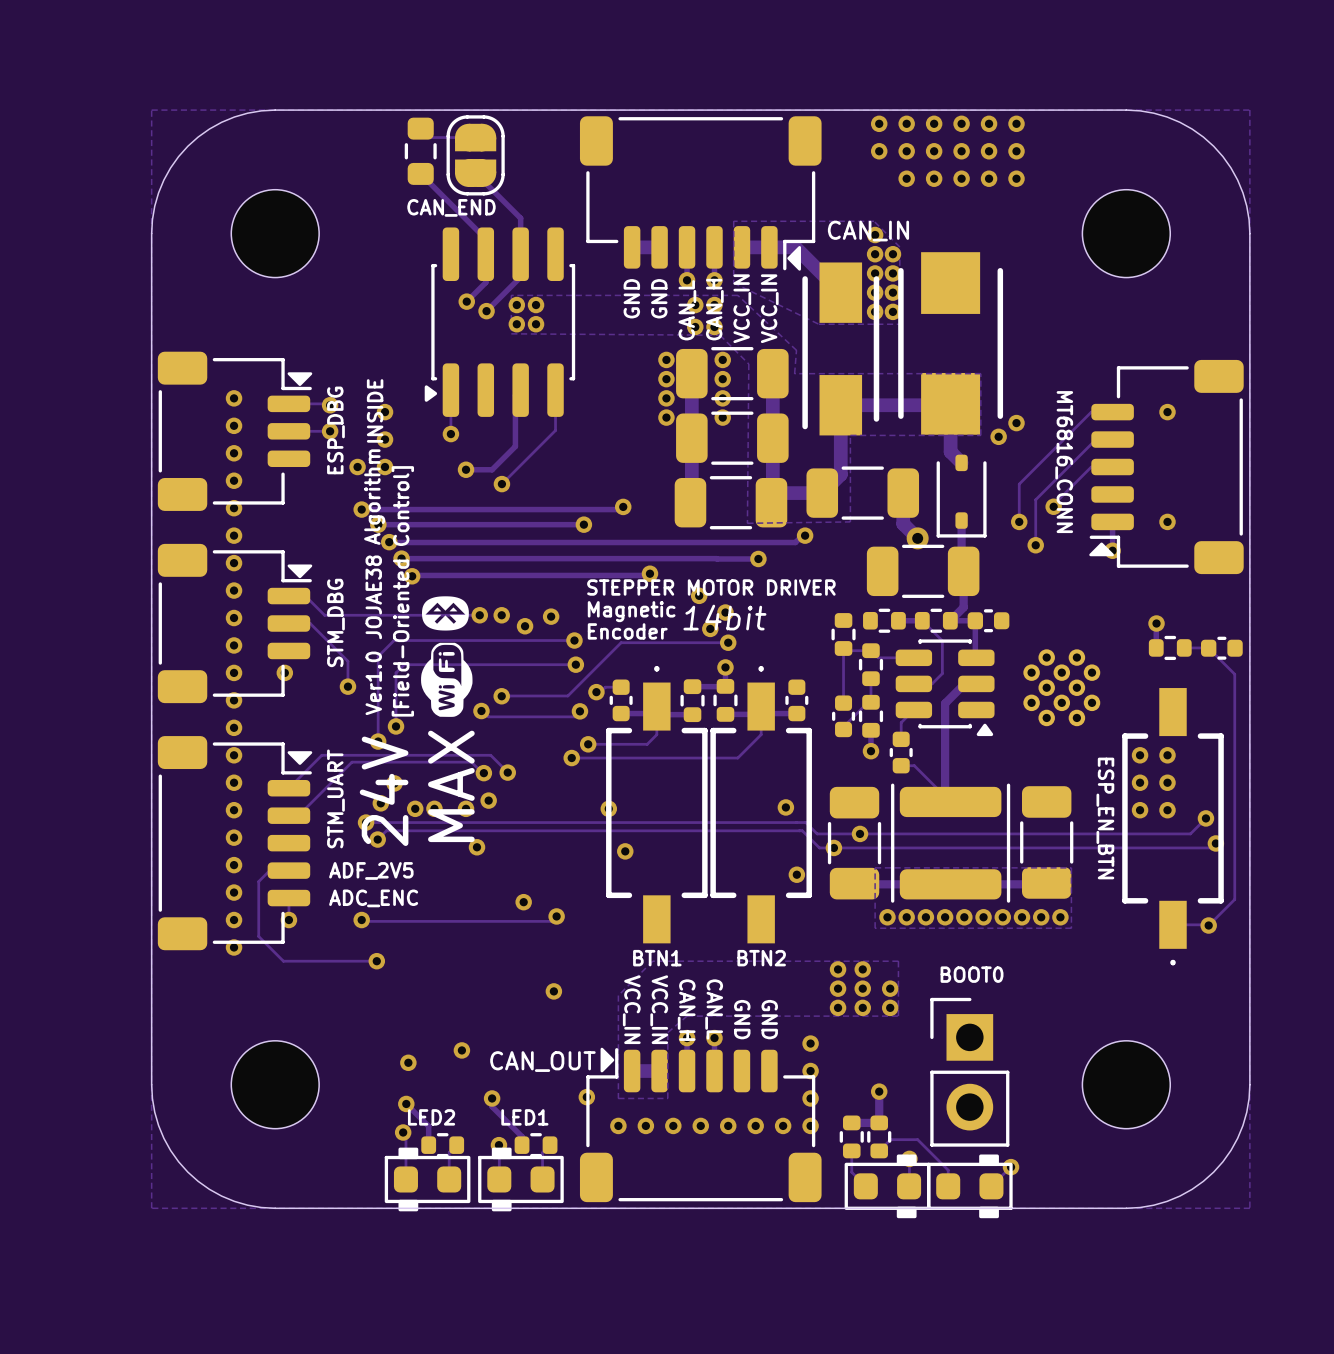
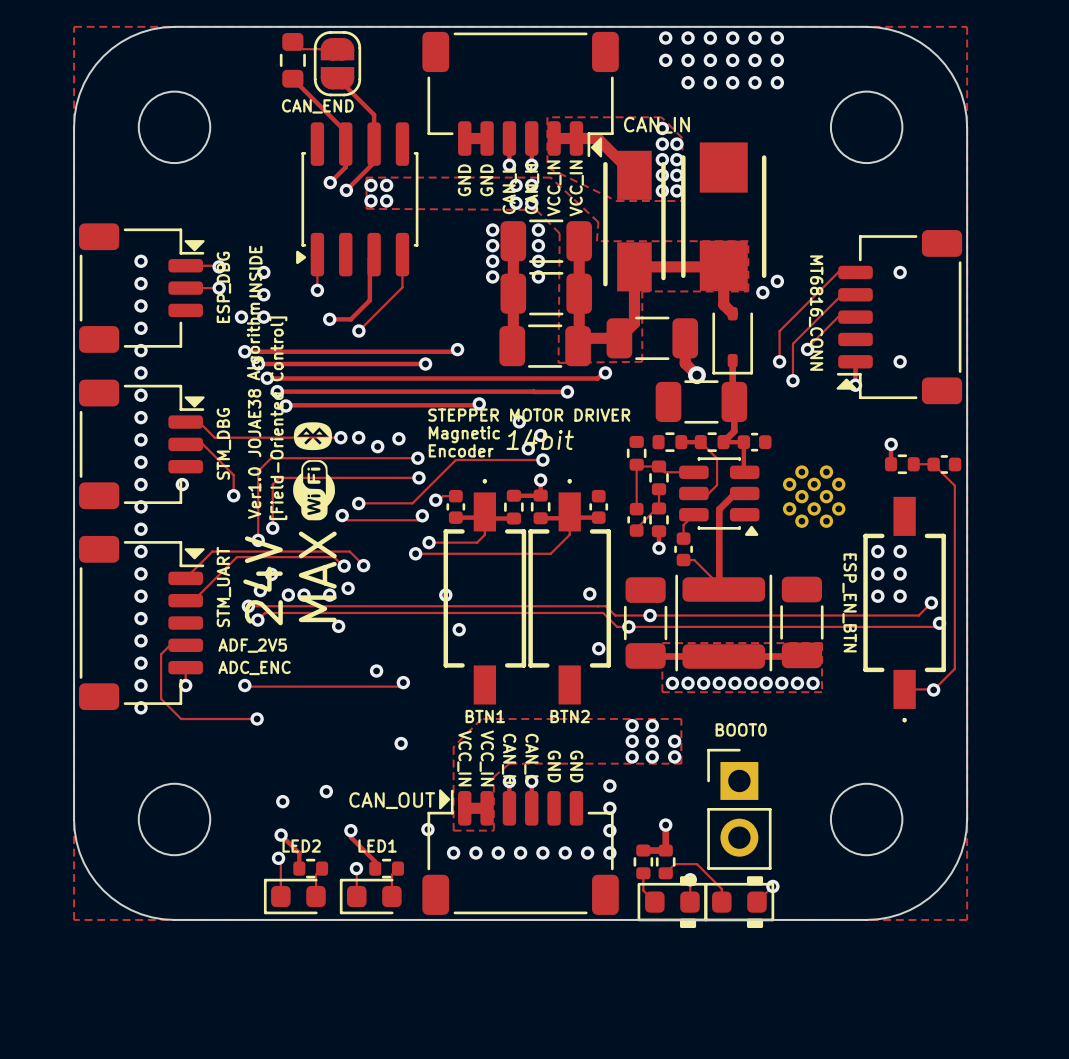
part footprint: [384, 1147, 471, 1212] -> [263, 878, 326, 915]
part footprint: [478, 1147, 564, 1212] -> [339, 878, 402, 915]

